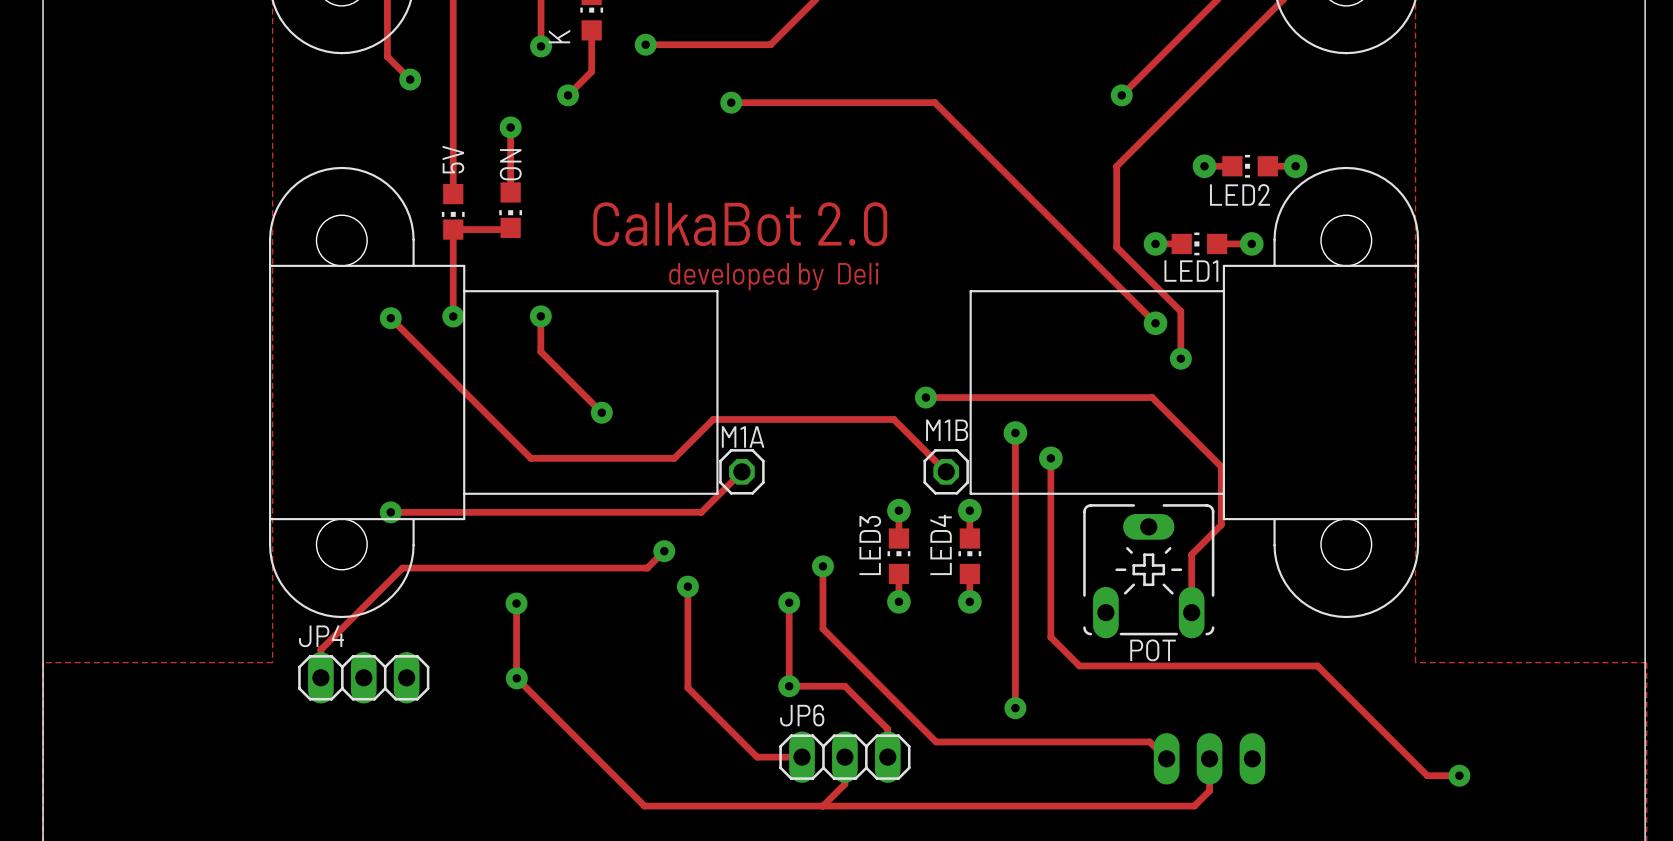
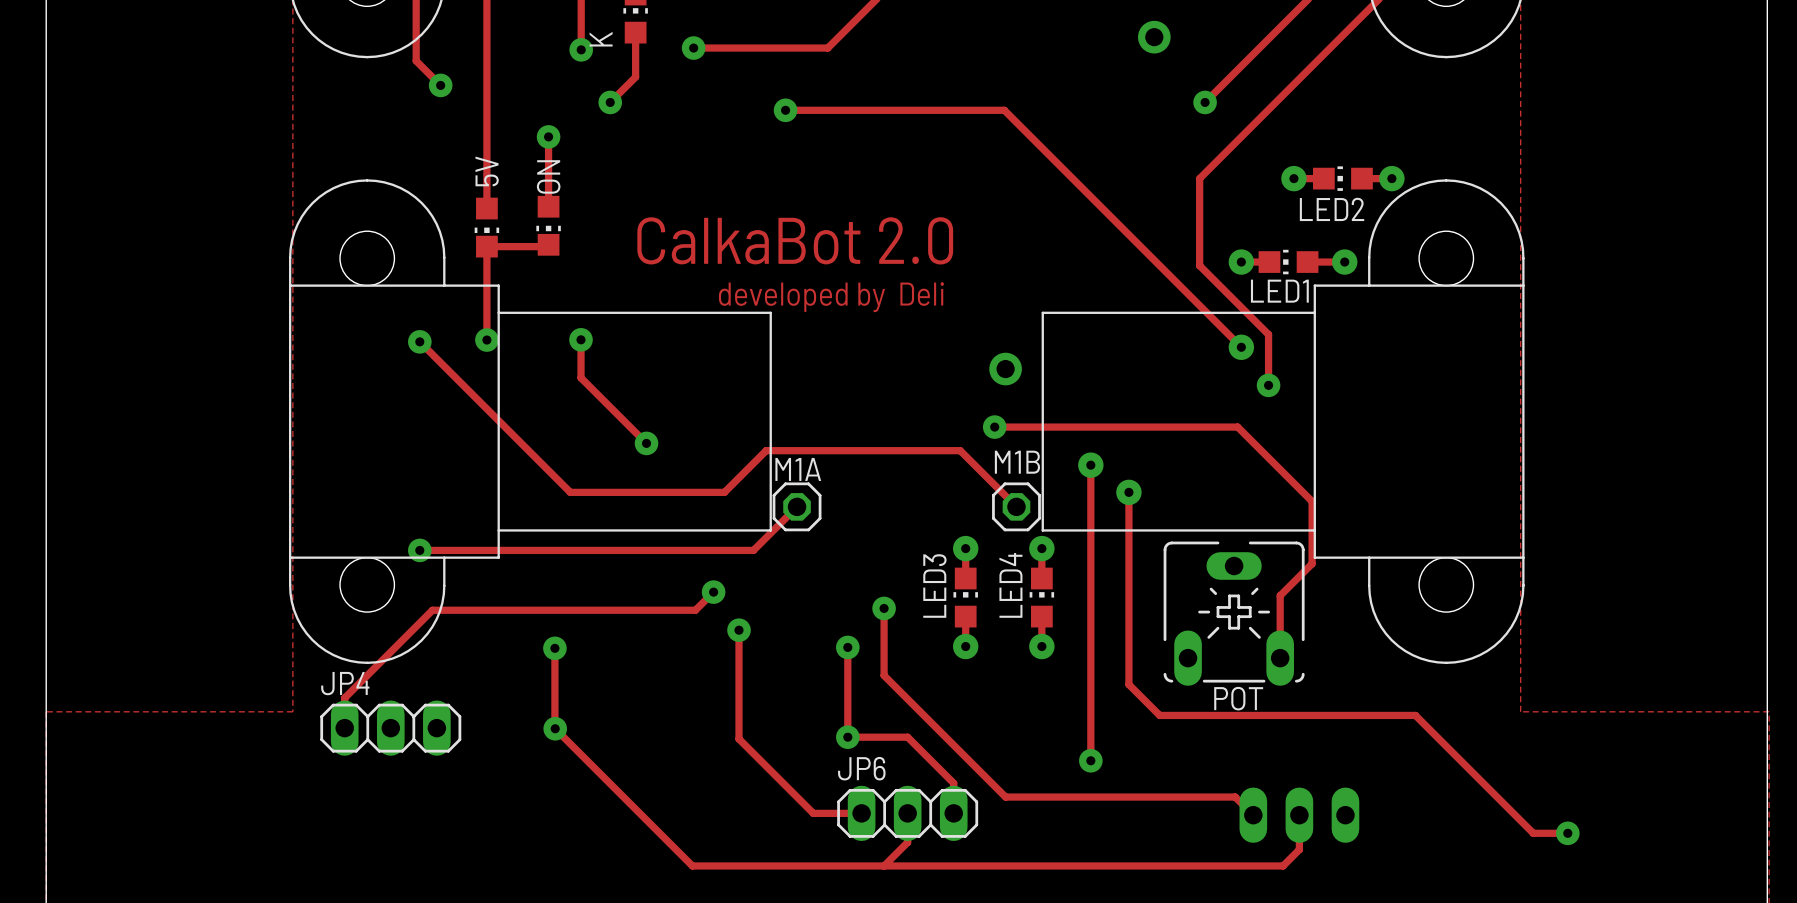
via: none -> (1154, 37)
via: none -> (1005, 369)

